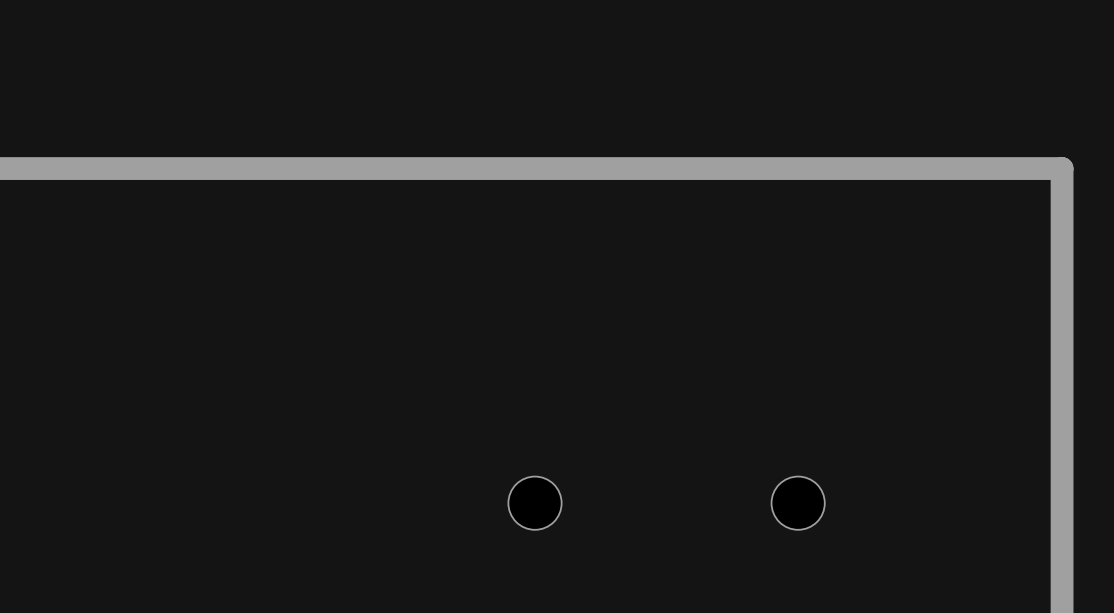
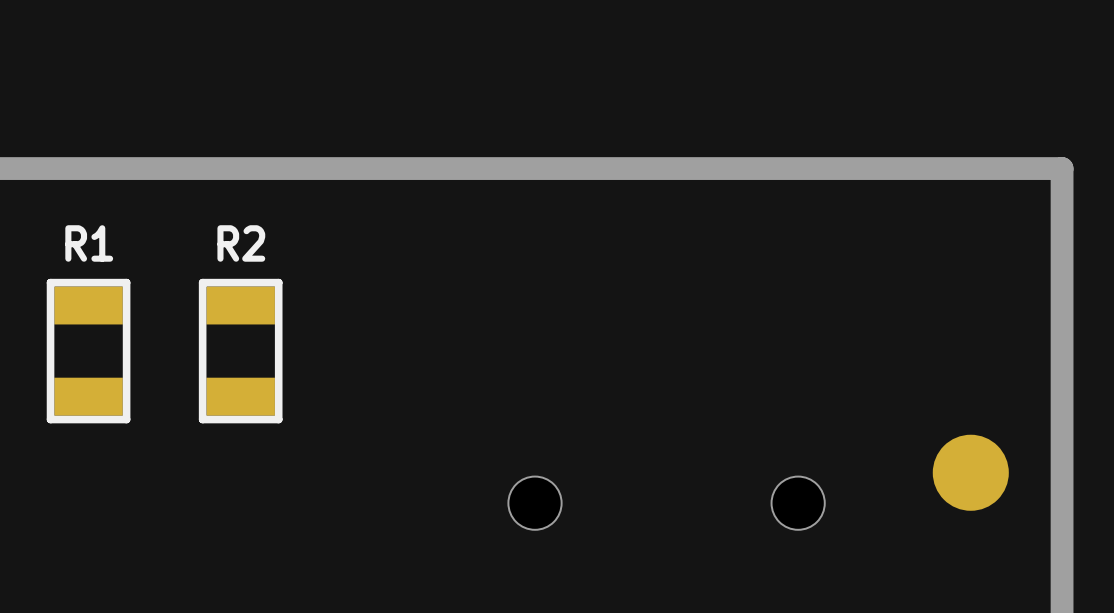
R1: none -> (88, 351)
R2: none -> (240, 351)
part: none -> (970, 472)

